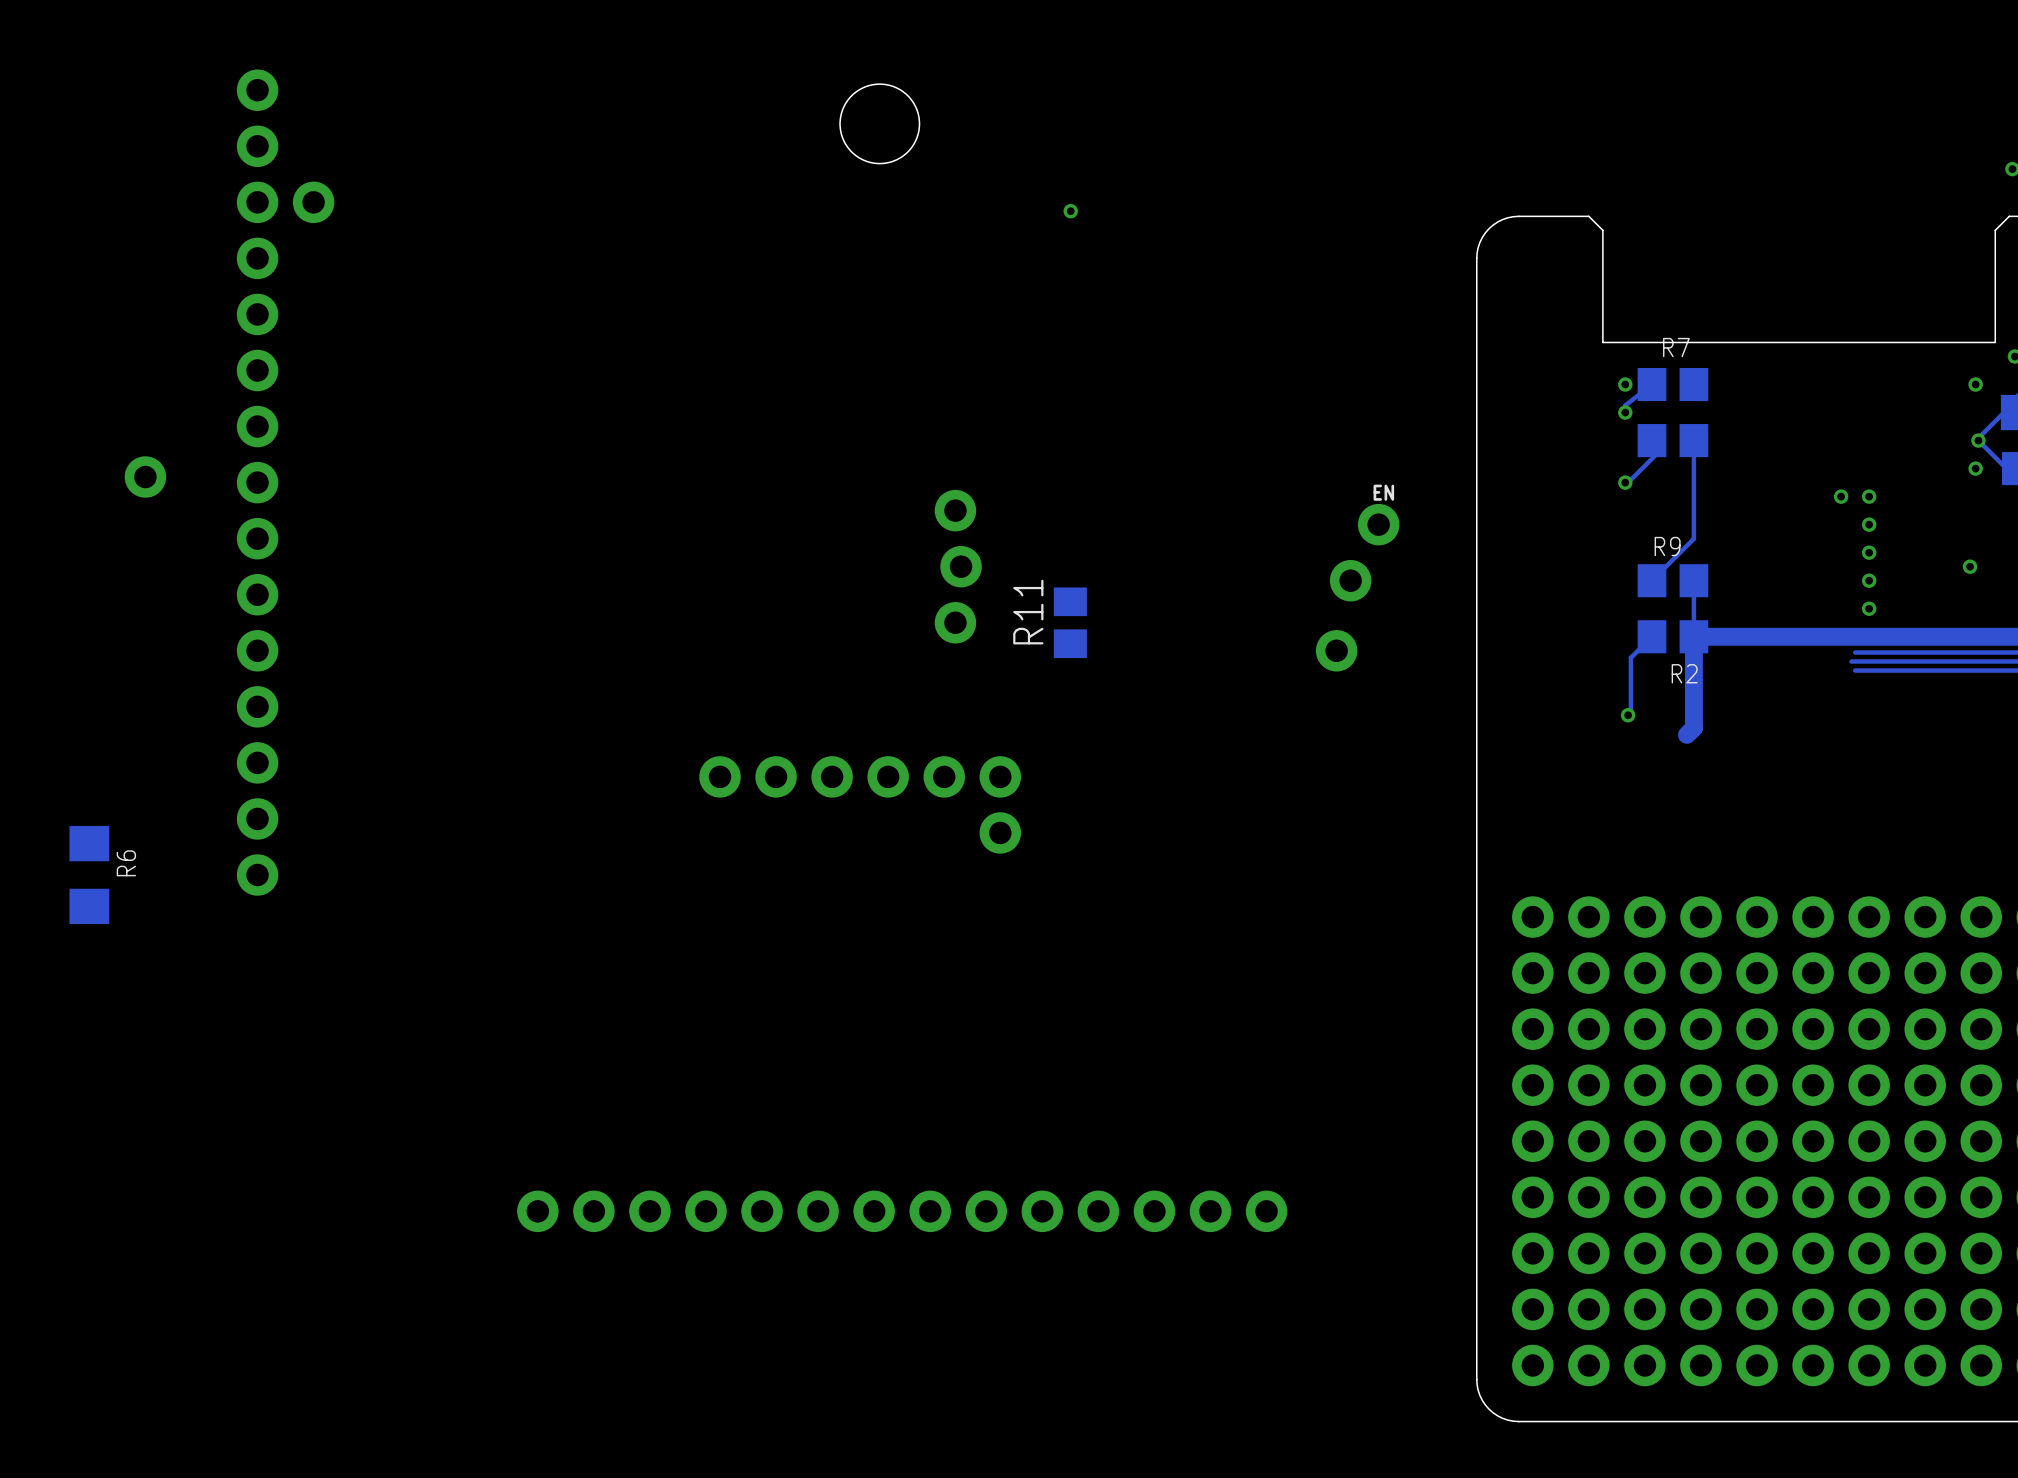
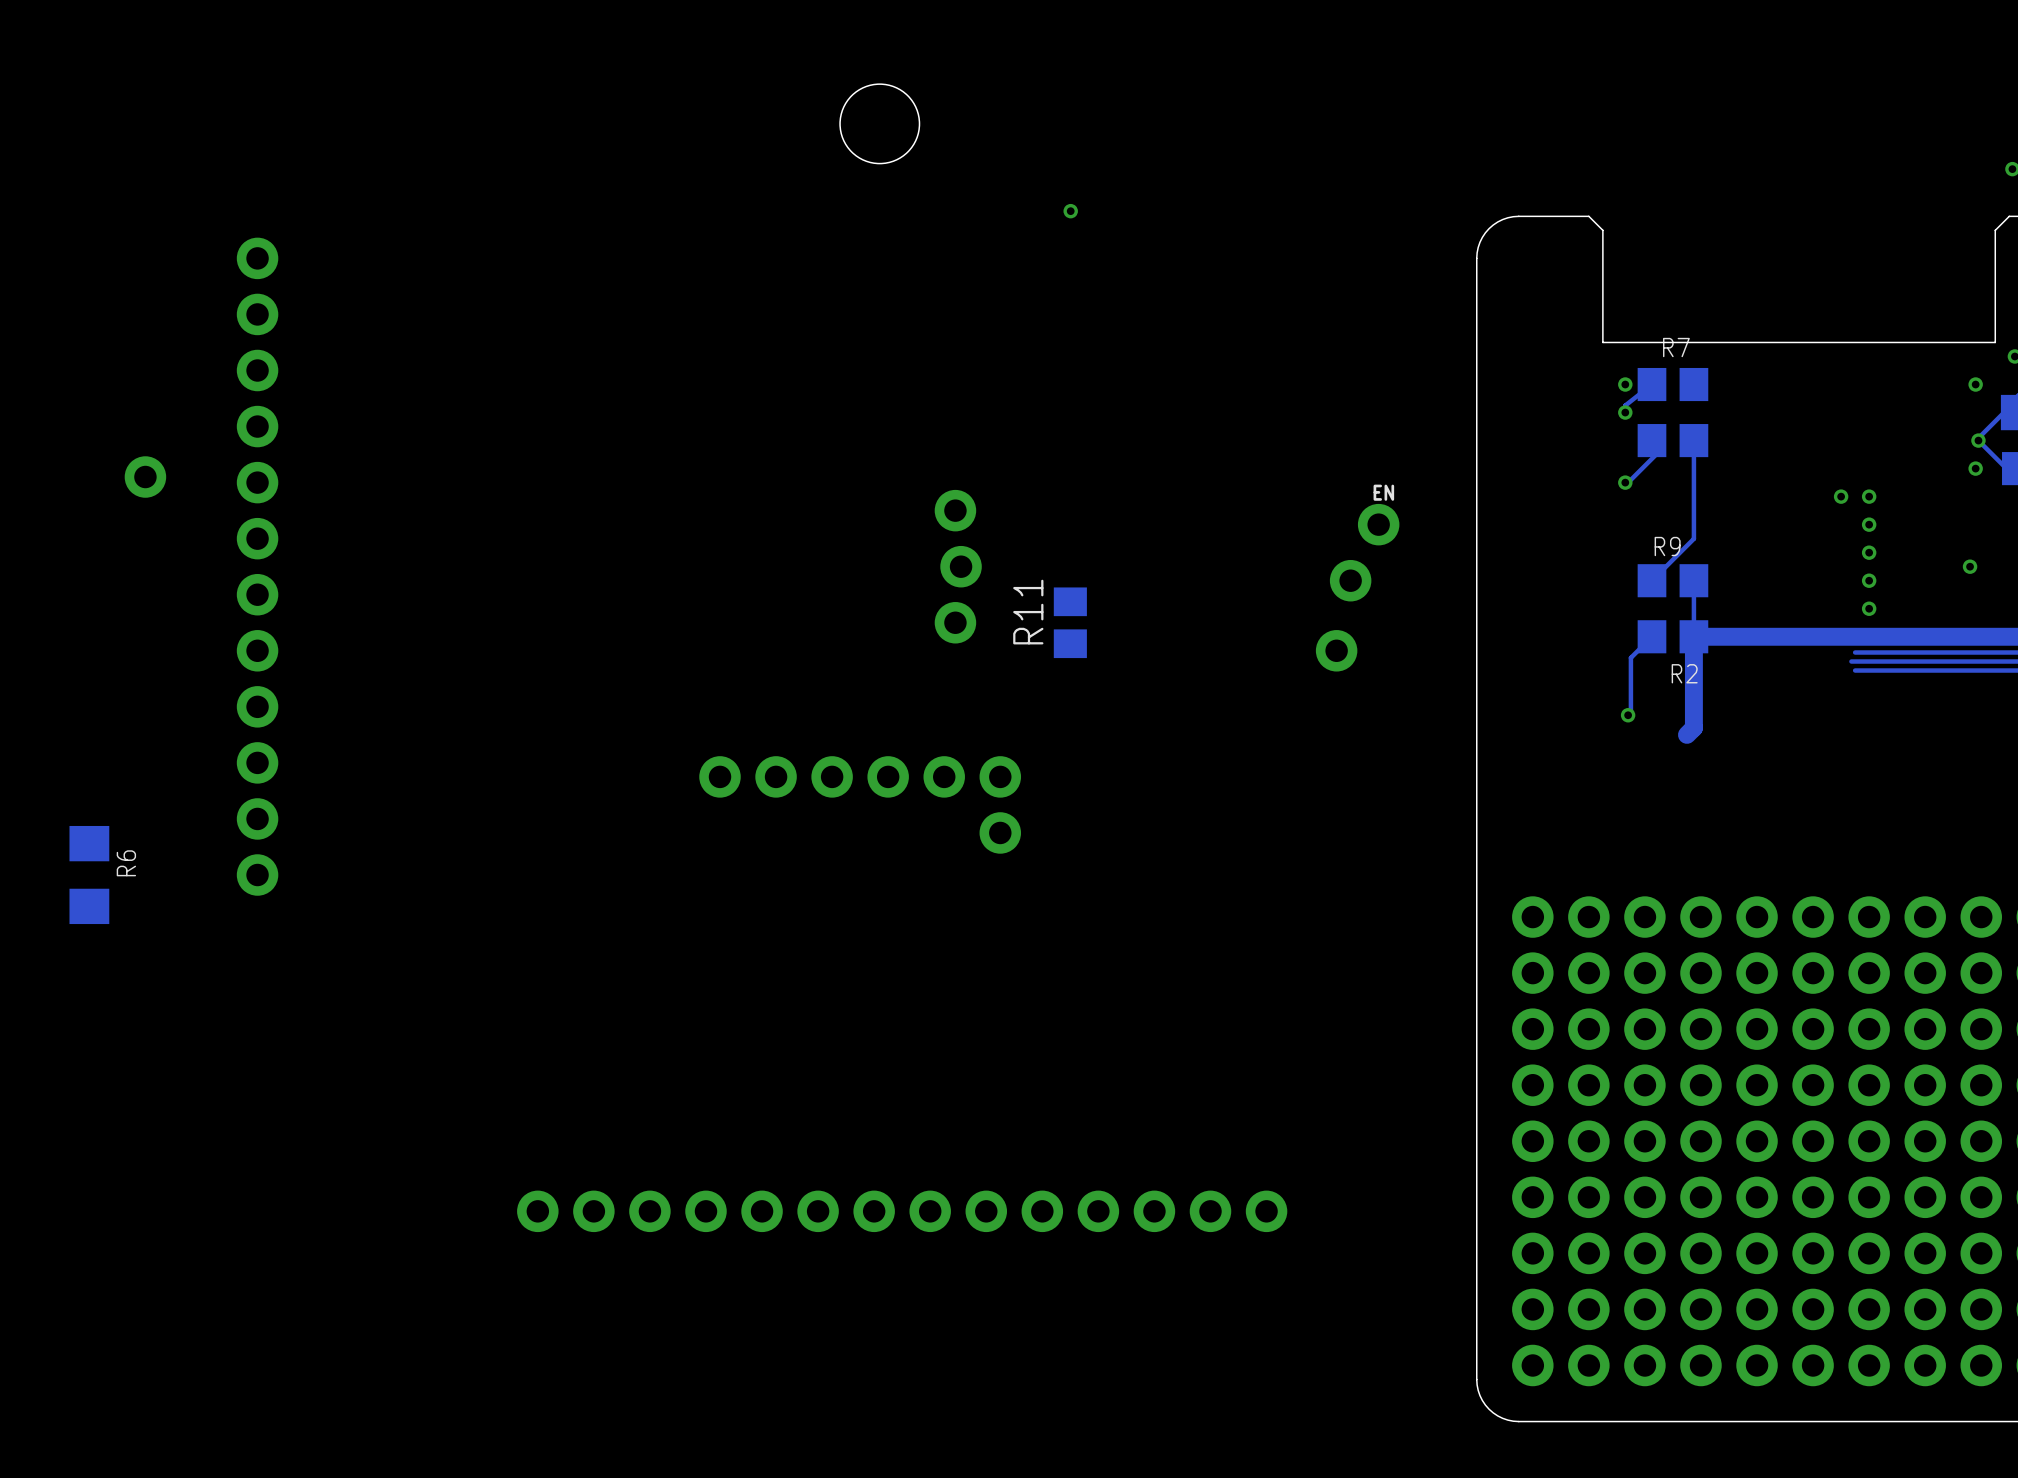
part: (257, 118) -> none
part: (285, 202) -> none

